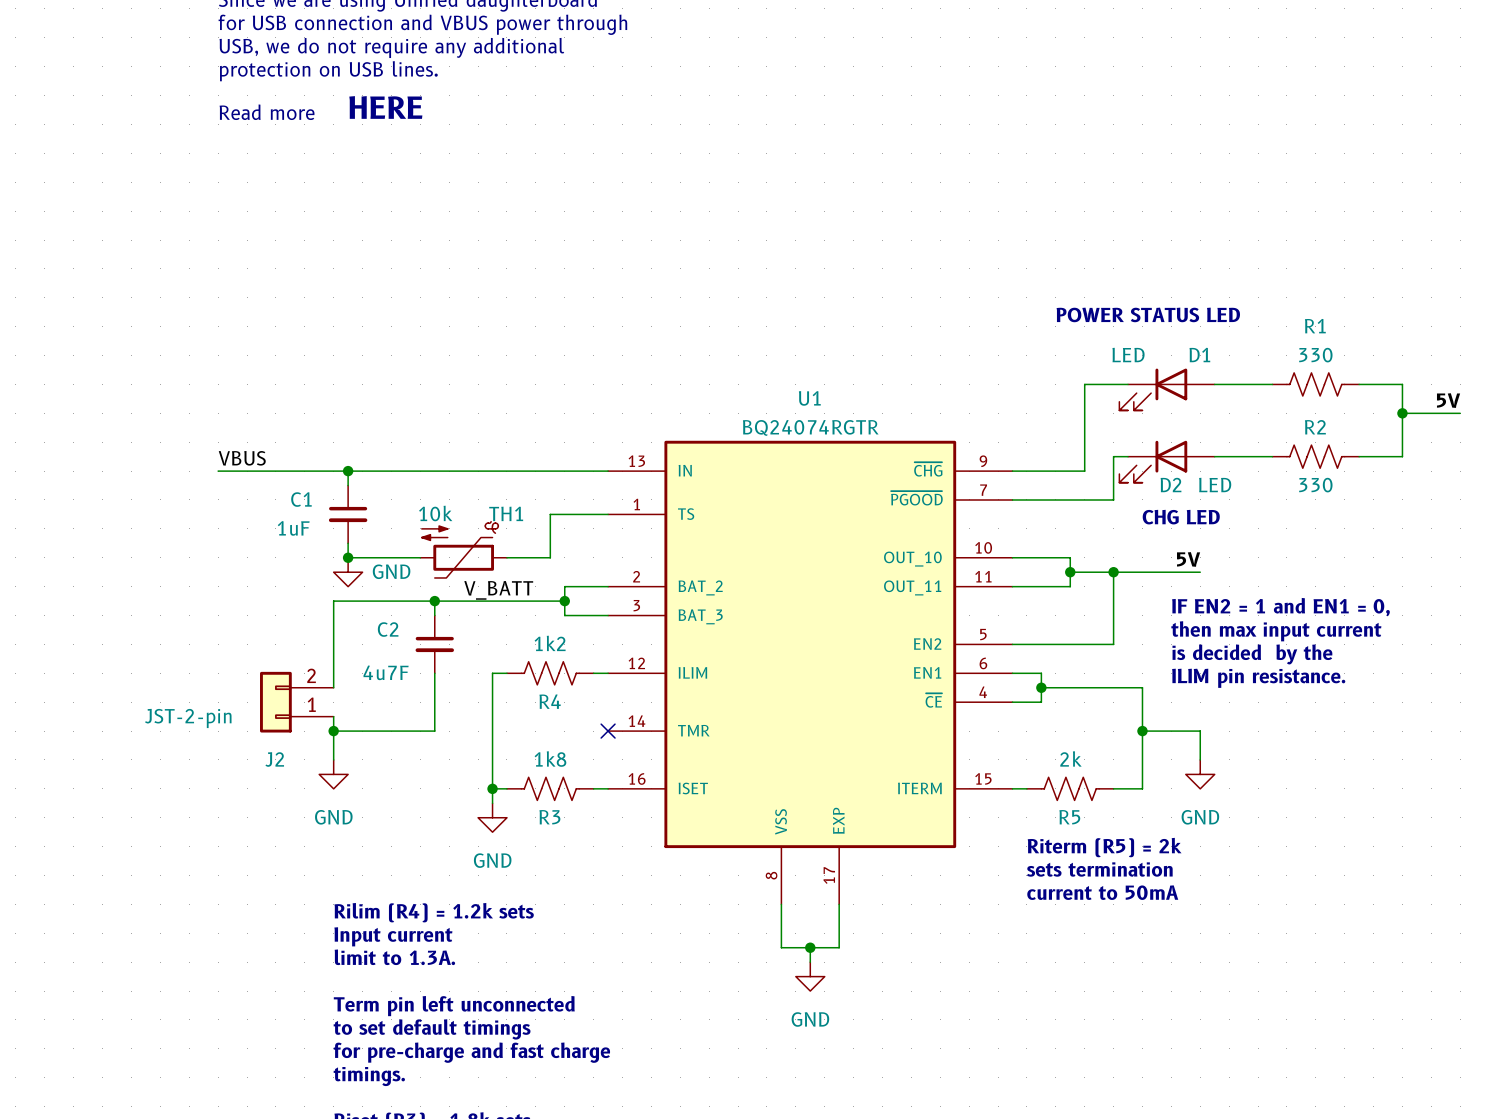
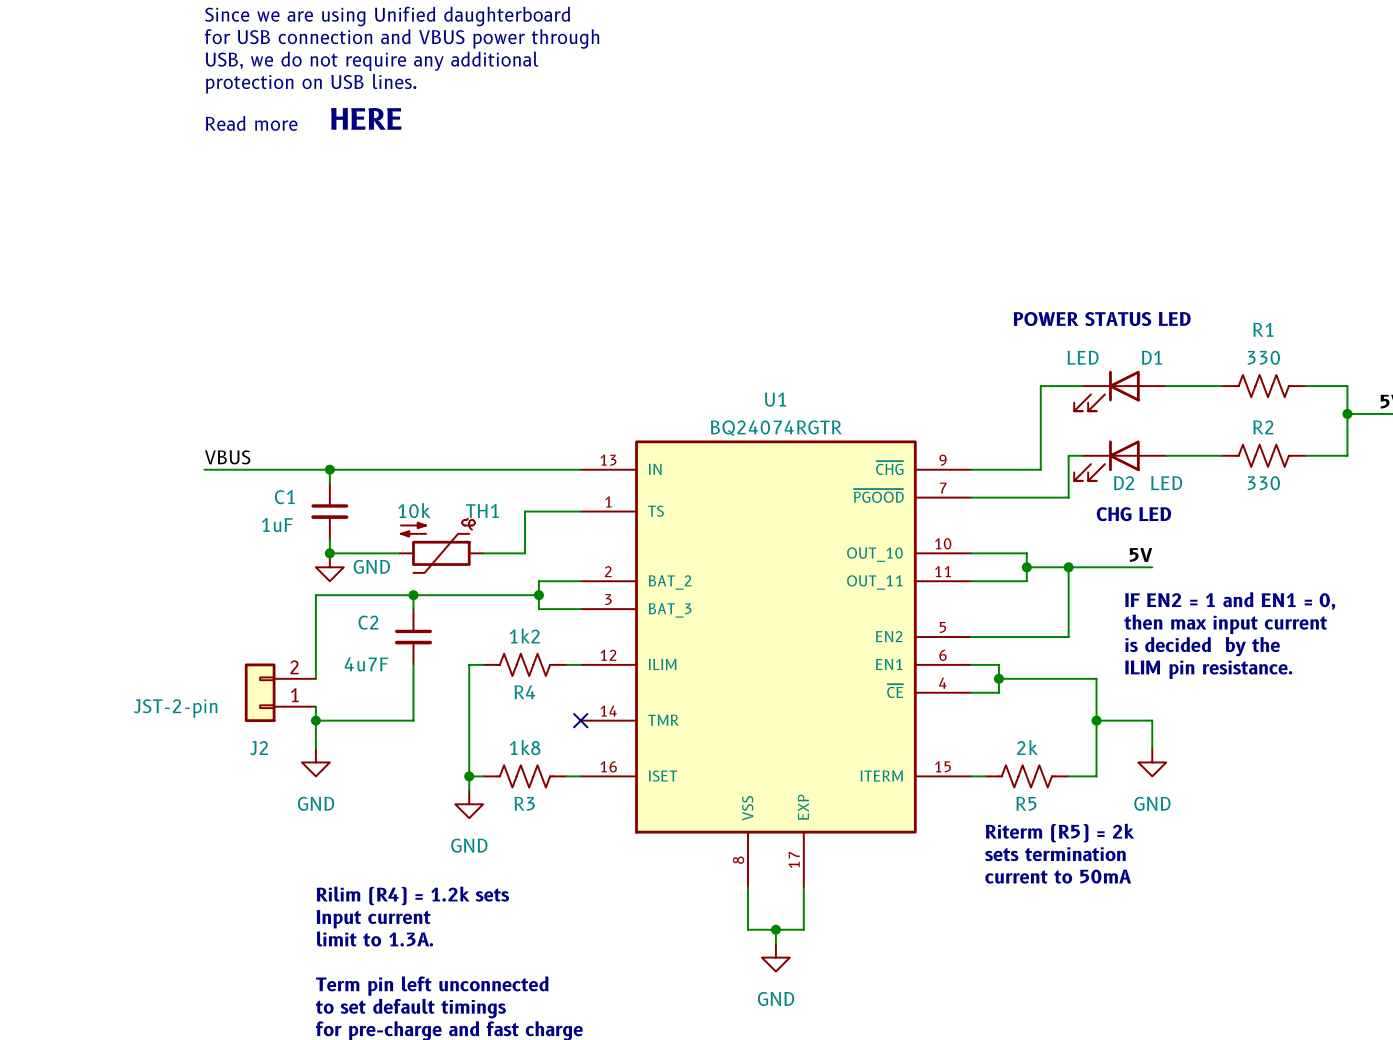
label: V_BATT (498, 590) -> none

